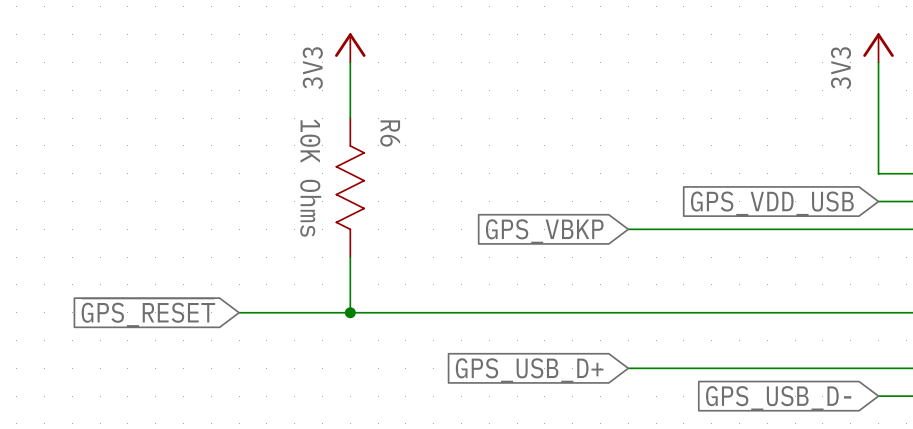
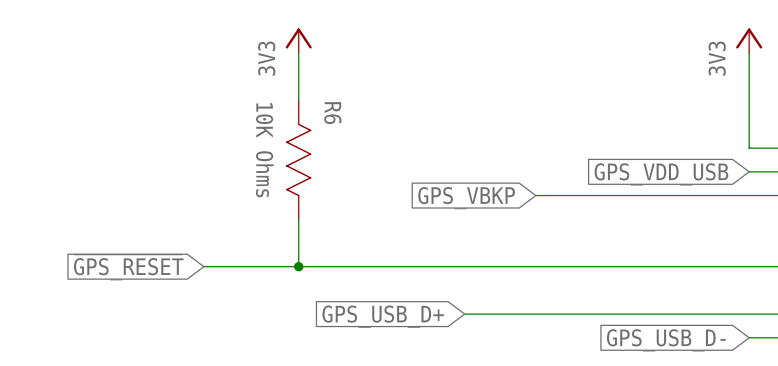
wire: none -> (464, 314) (535, 314)
global label position: GPS_USB_D+ (529, 370) -> GPS_USB_D+ (383, 316)

